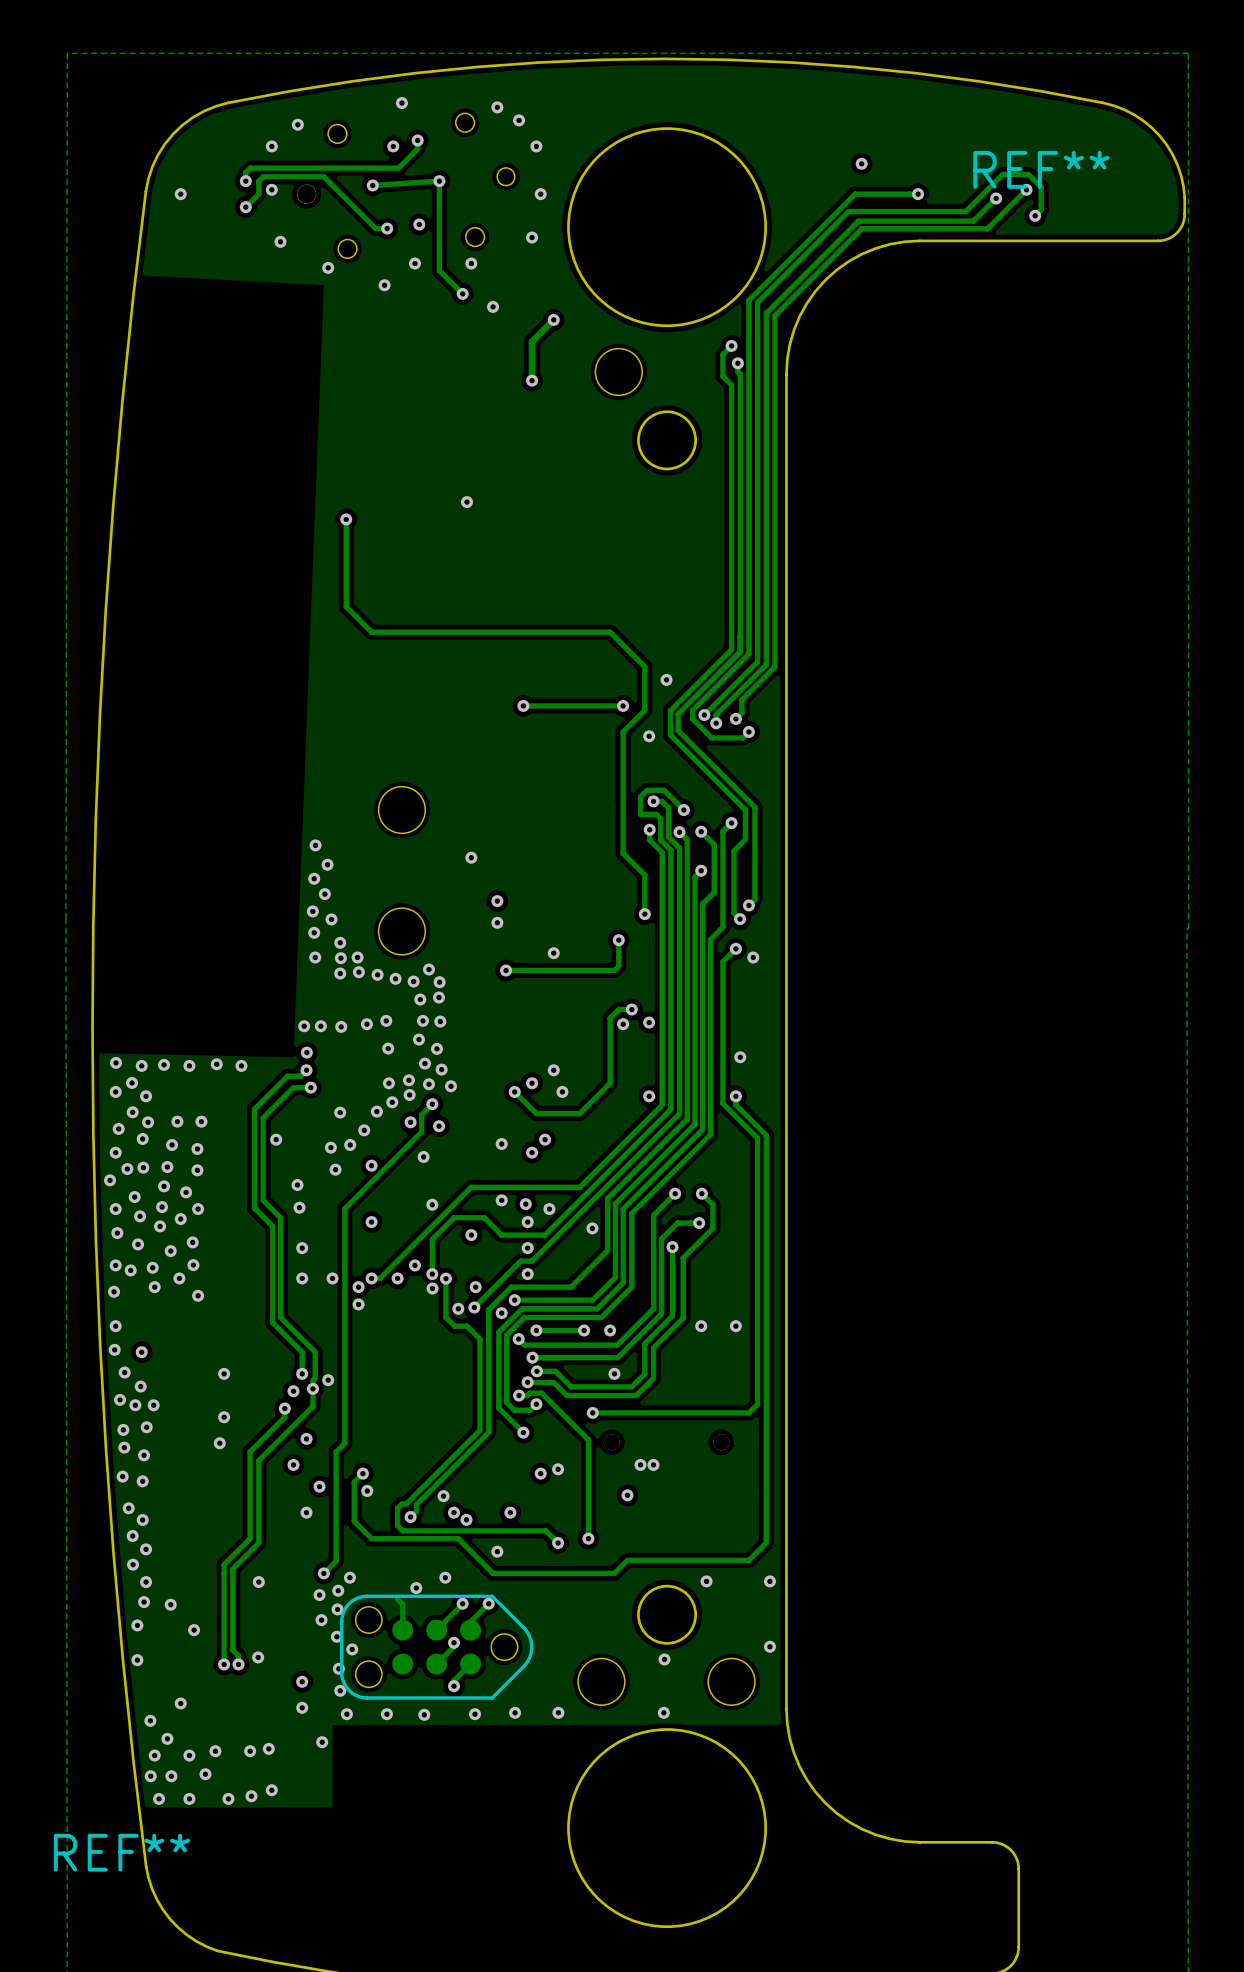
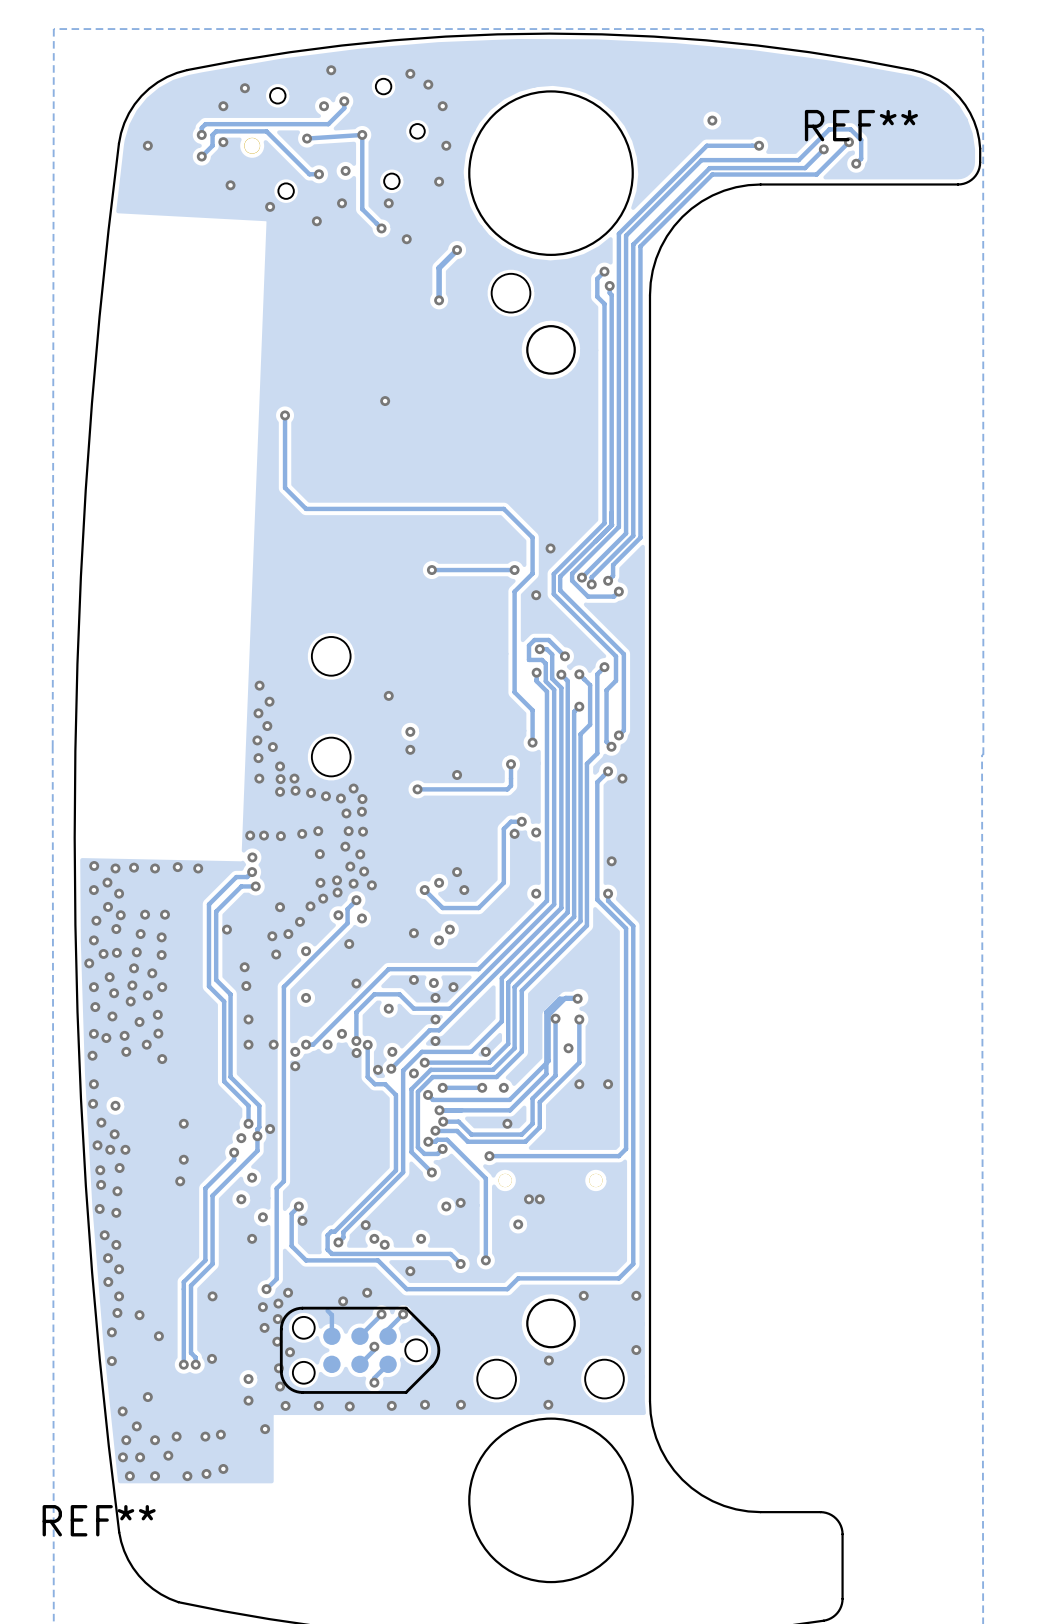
track: (675, 1193) (653, 1215) (653, 1308) -> (579, 997) (565, 997) (548, 1015) (548, 1061) (539, 1069)
via: (675, 1193) -> none
track: (701, 1193) (712, 1204) (712, 1228) (683, 1258) (683, 1318) -> (579, 1019) (579, 1062) (564, 1077)
via: (701, 1193) -> none
via: (592, 1228) -> none
via: none -> (579, 1019)
via: none -> (568, 1048)
via: none -> (485, 1051)

